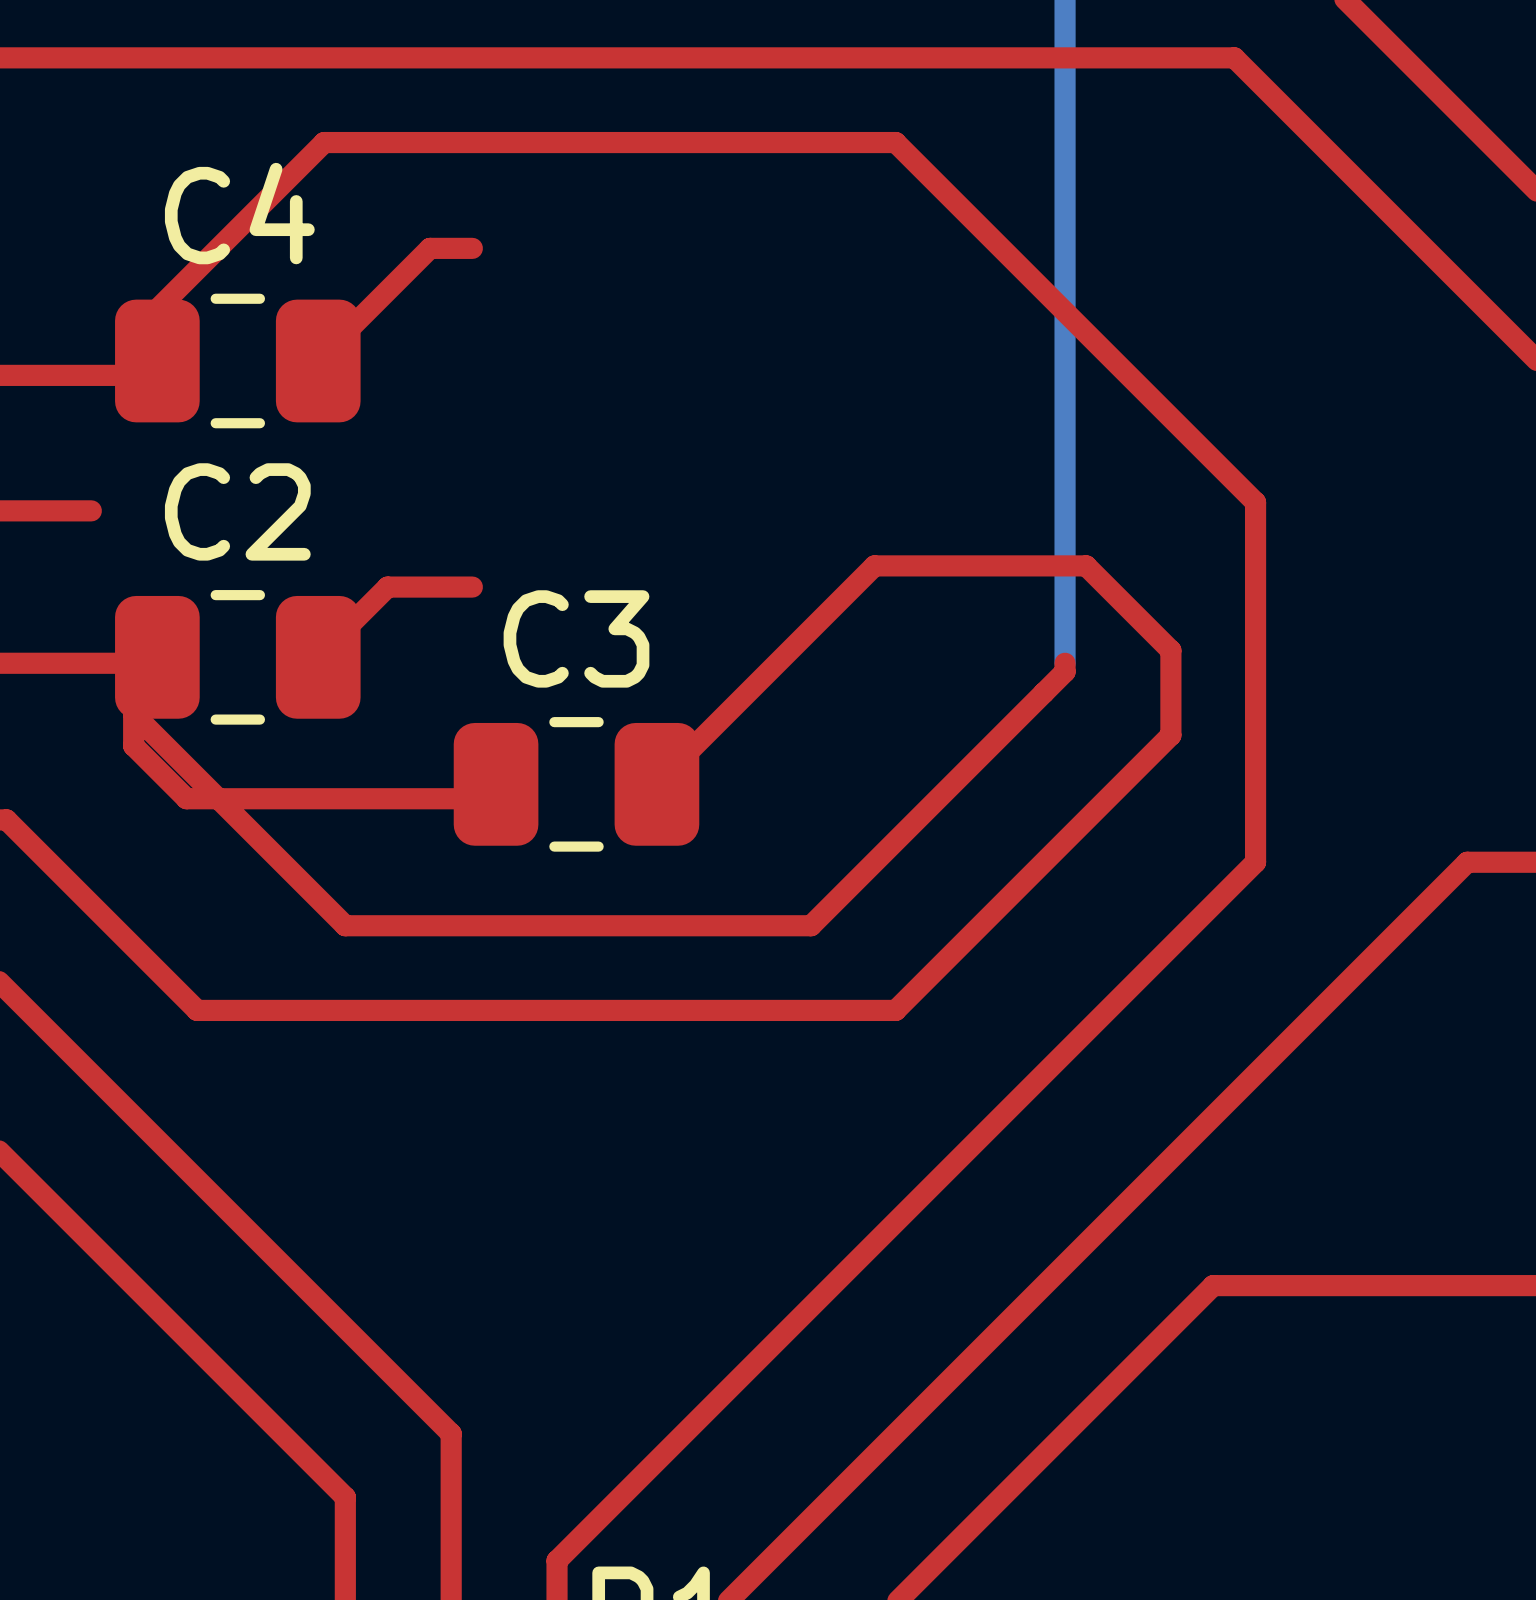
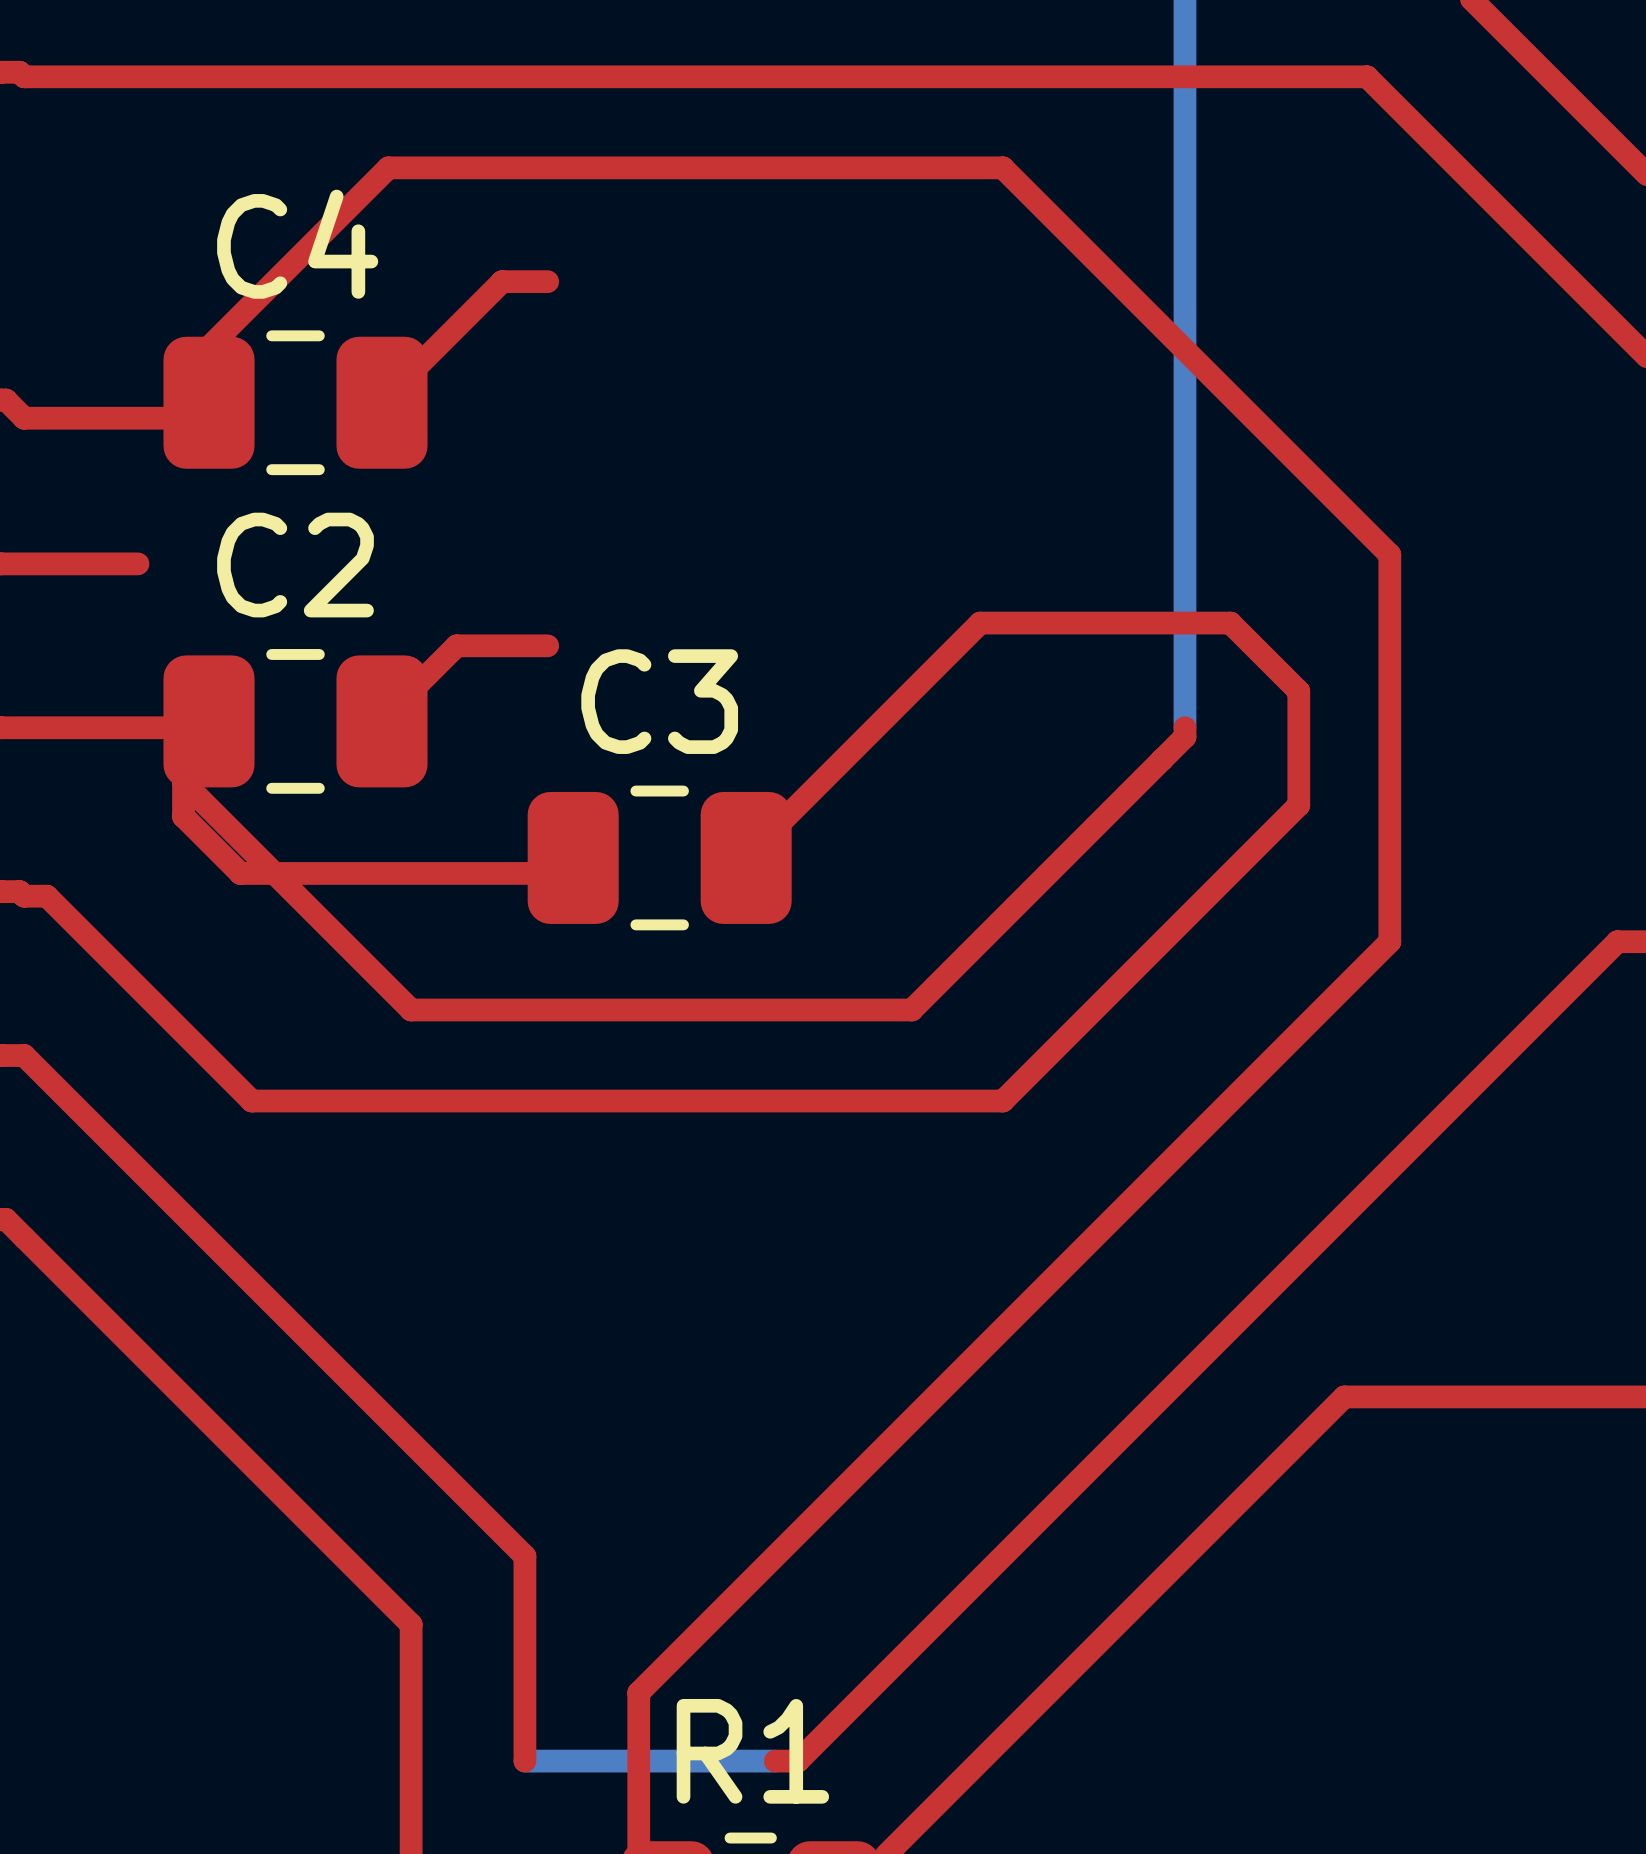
top track: (1086, 565) (1170, 650) -> (1207, 623) (1230, 623) (1298, 691) (1298, 714)

